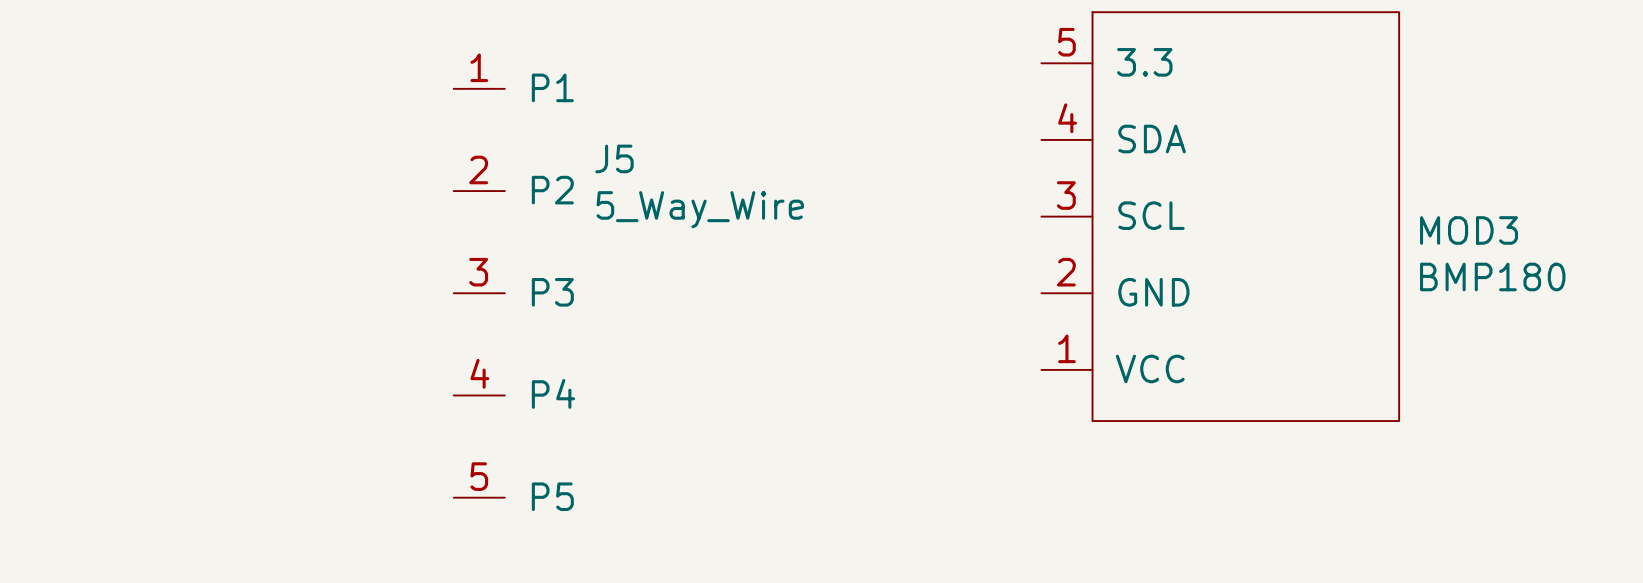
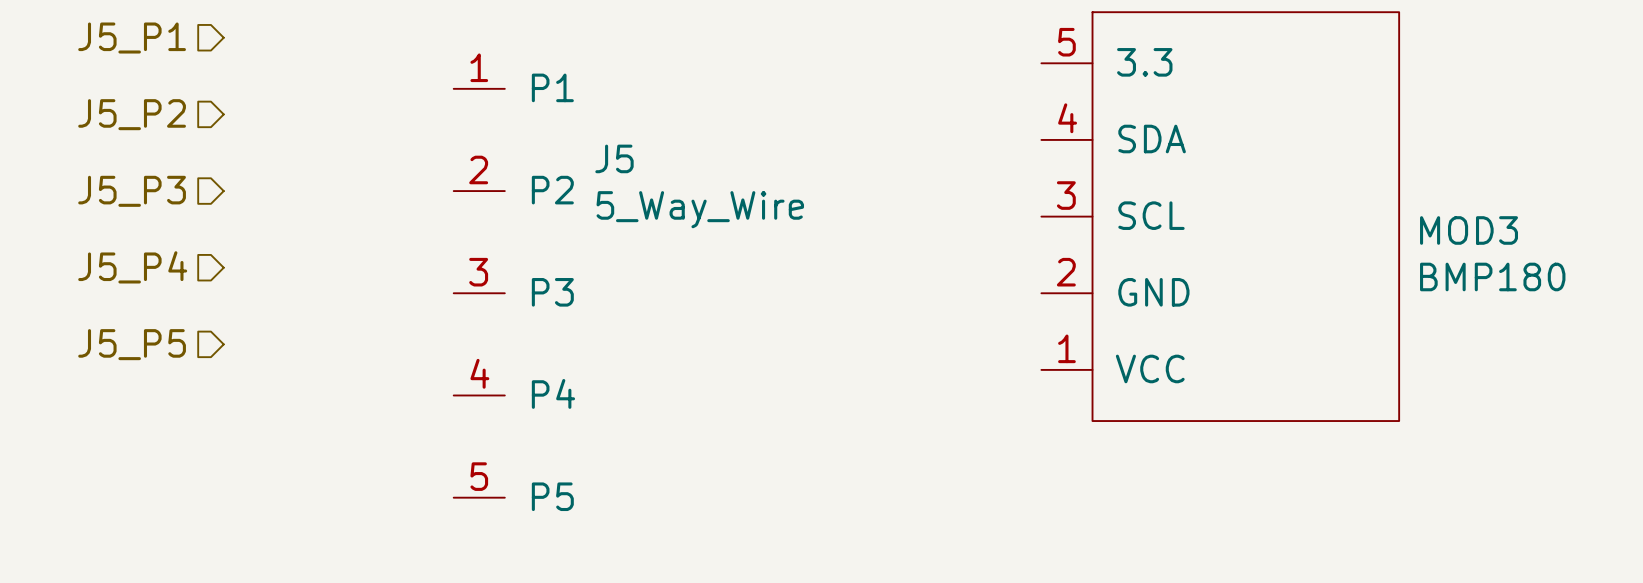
hierarchical label: none -> J5_P1 (132, 38)
hierarchical label: none -> J5_P2 (132, 114)
hierarchical label: none -> J5_P3 (132, 191)
hierarchical label: none -> J5_P4 (132, 267)
hierarchical label: none -> J5_P5 (132, 344)

